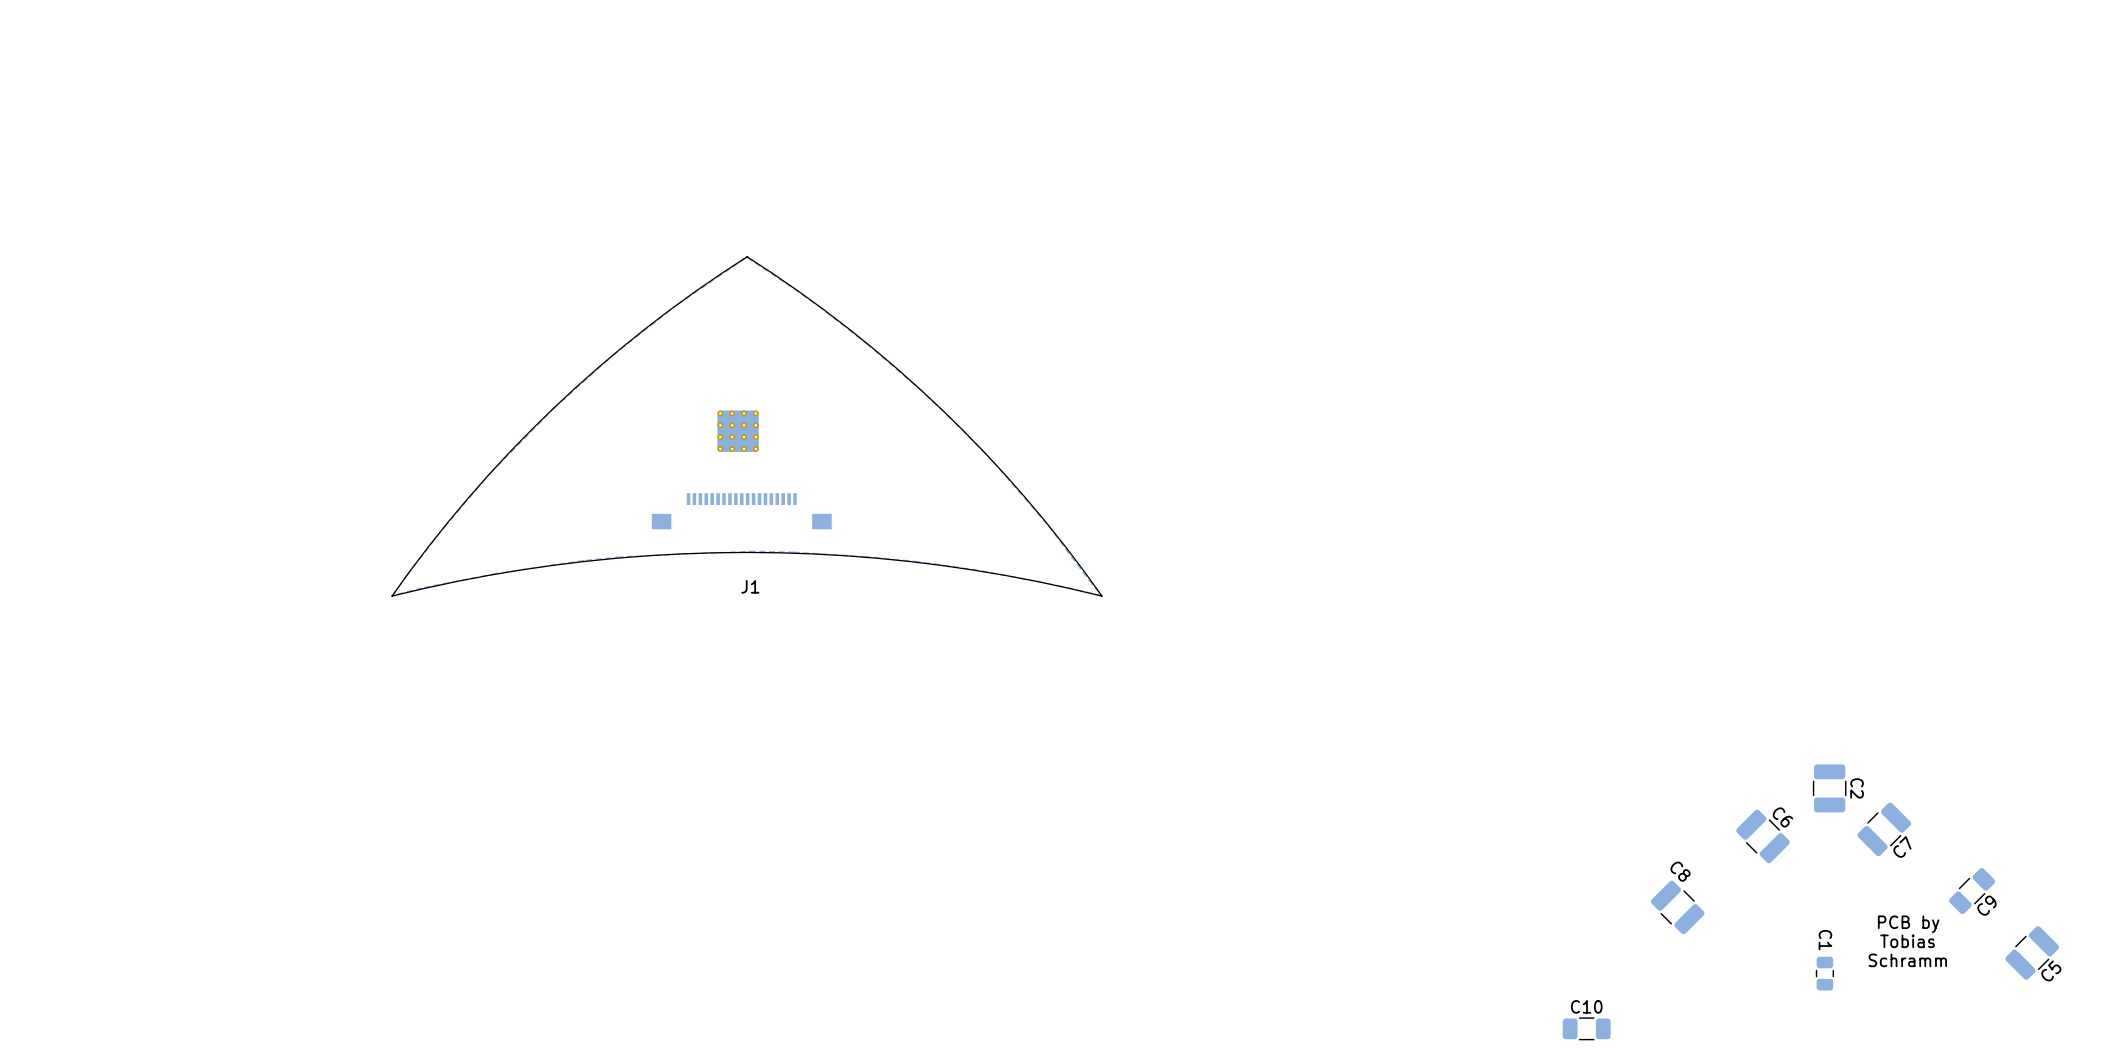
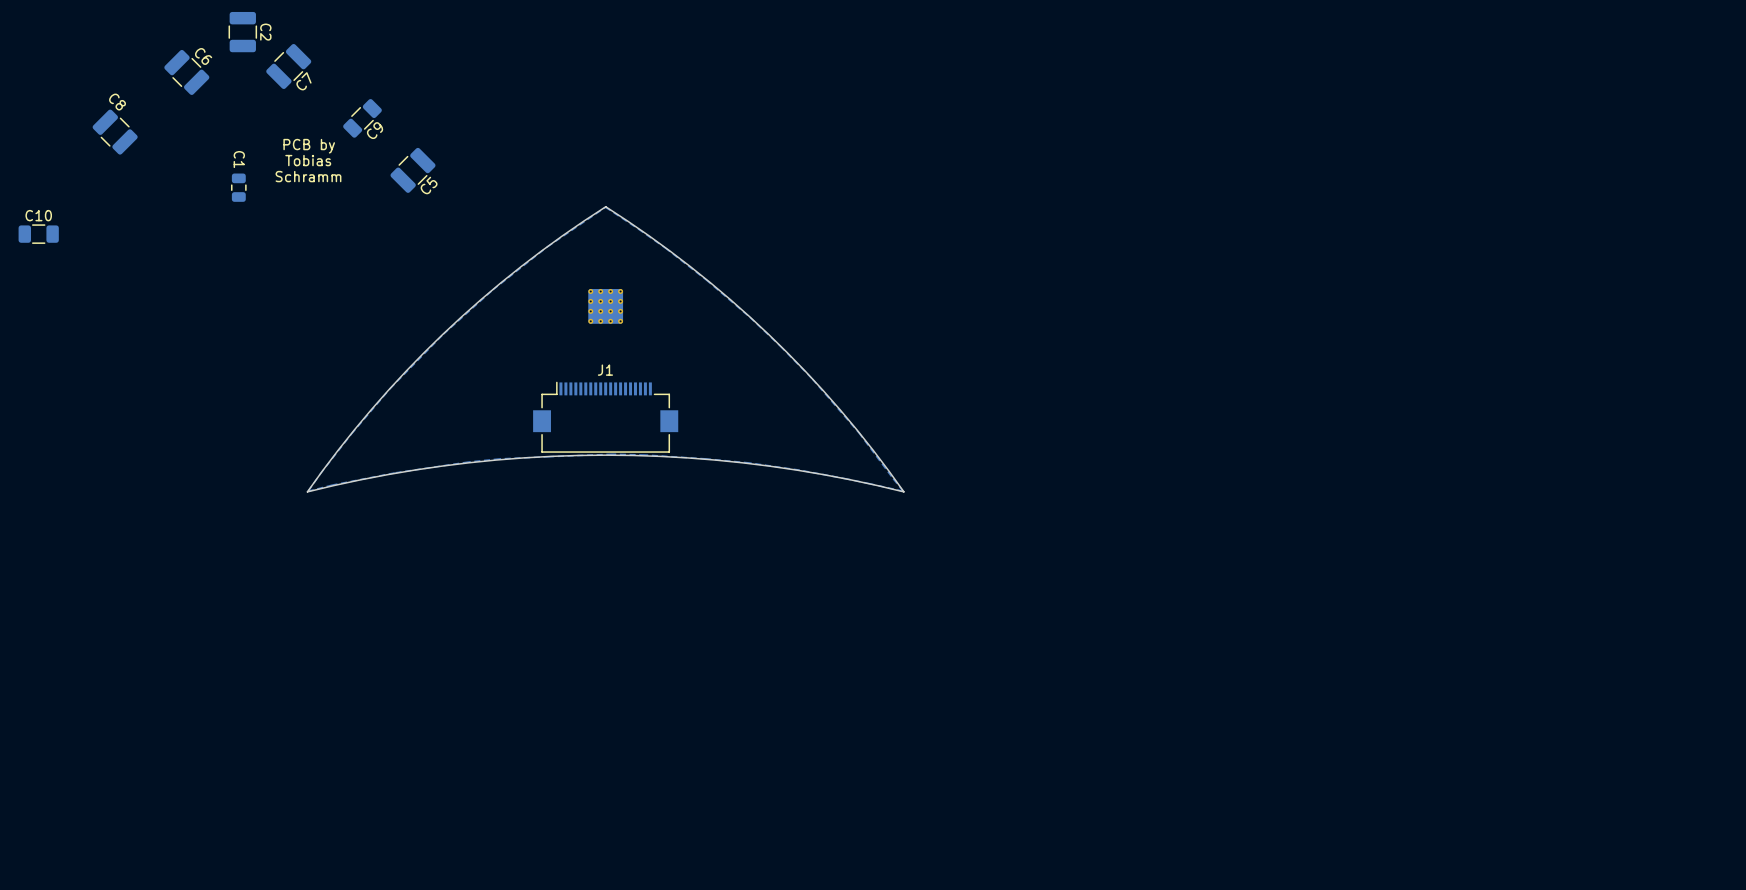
text: none -> PCB by (309, 146)
text: none -> Tobias (308, 160)
text: none -> Schramm (308, 176)
part position: (738, 431) -> (605, 306)
J1 footprint: [651, 493, 832, 530] -> [533, 381, 679, 453]
J1 name position: J1 (750, 586) -> J1 (605, 370)
C2 position: (1829, 788) -> (242, 32)
C7 position: (1884, 829) -> (288, 66)
C6 position: (1763, 836) -> (186, 72)
C9 position: (1972, 891) -> (362, 118)
C8 position: (1677, 907) -> (115, 132)
text: PCB by (1908, 924) -> none
text: Tobias (1907, 941) -> none
C5 position: (2032, 952) -> (413, 170)
text: Schramm (1907, 960) -> none
C1 position: (1824, 973) -> (238, 187)
C10 position: (1586, 1028) -> (38, 234)

